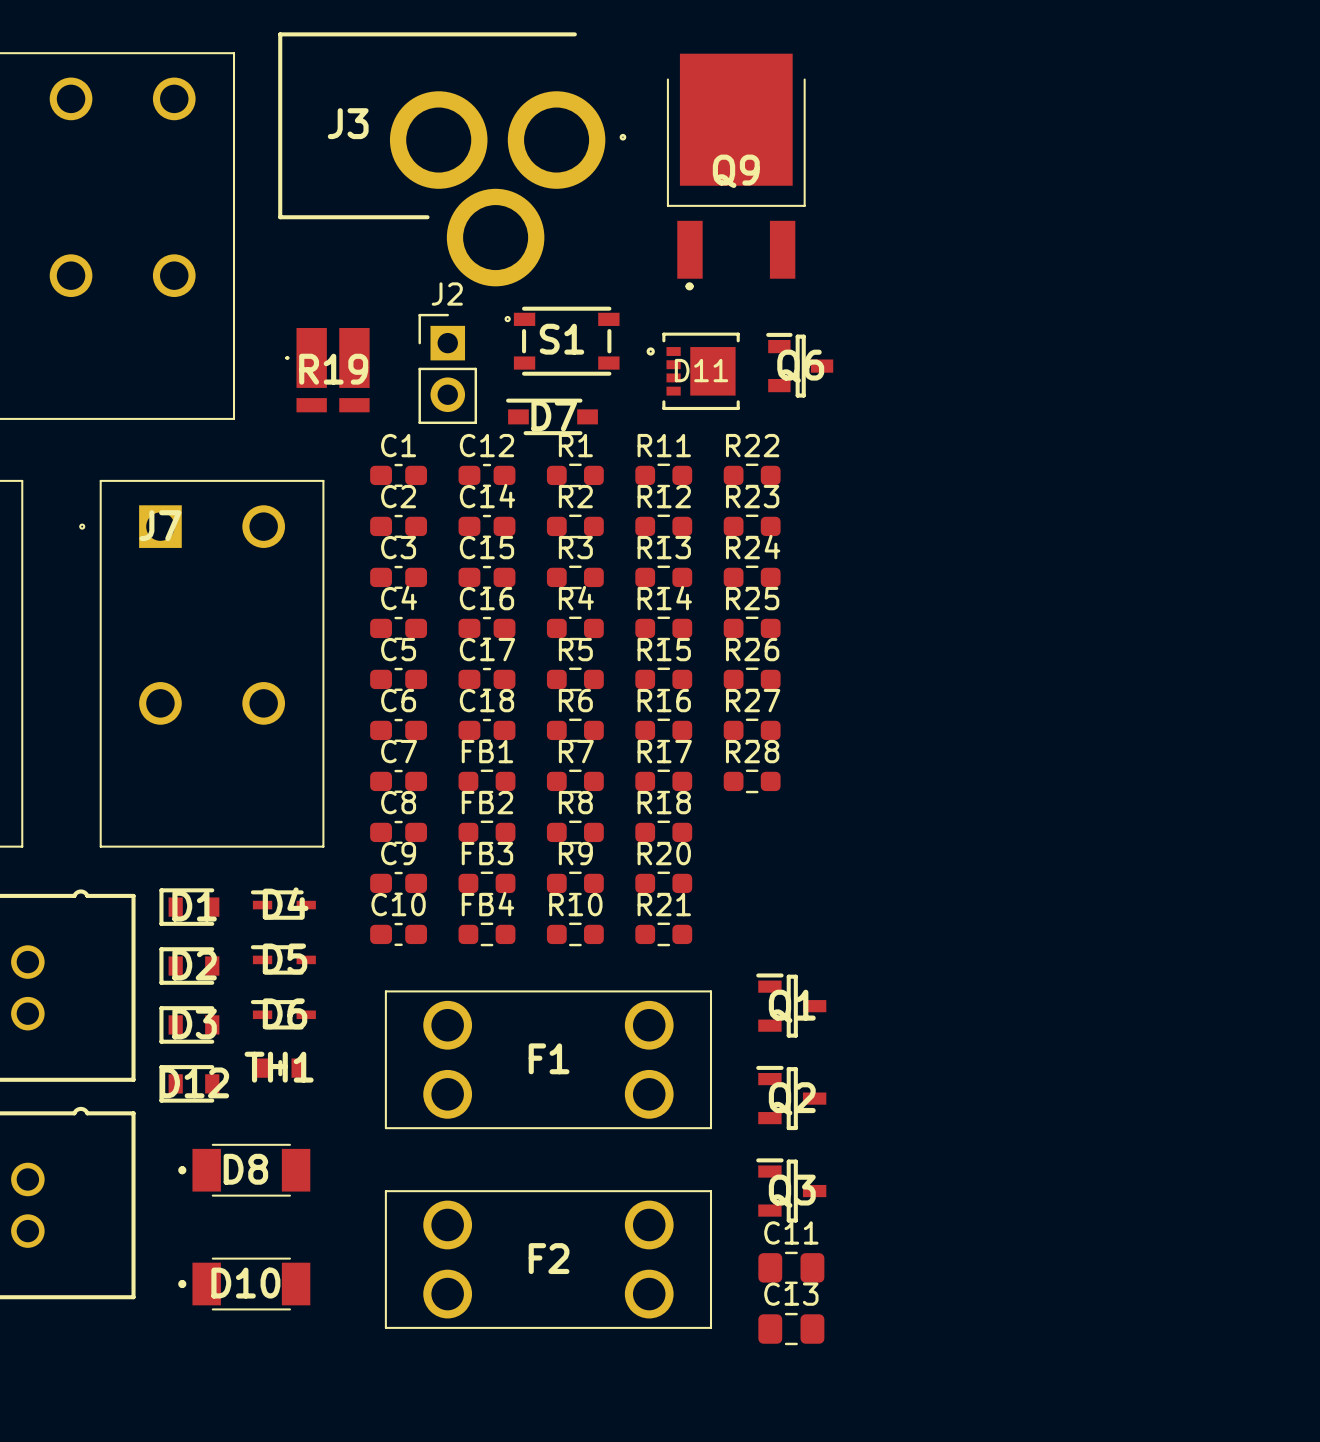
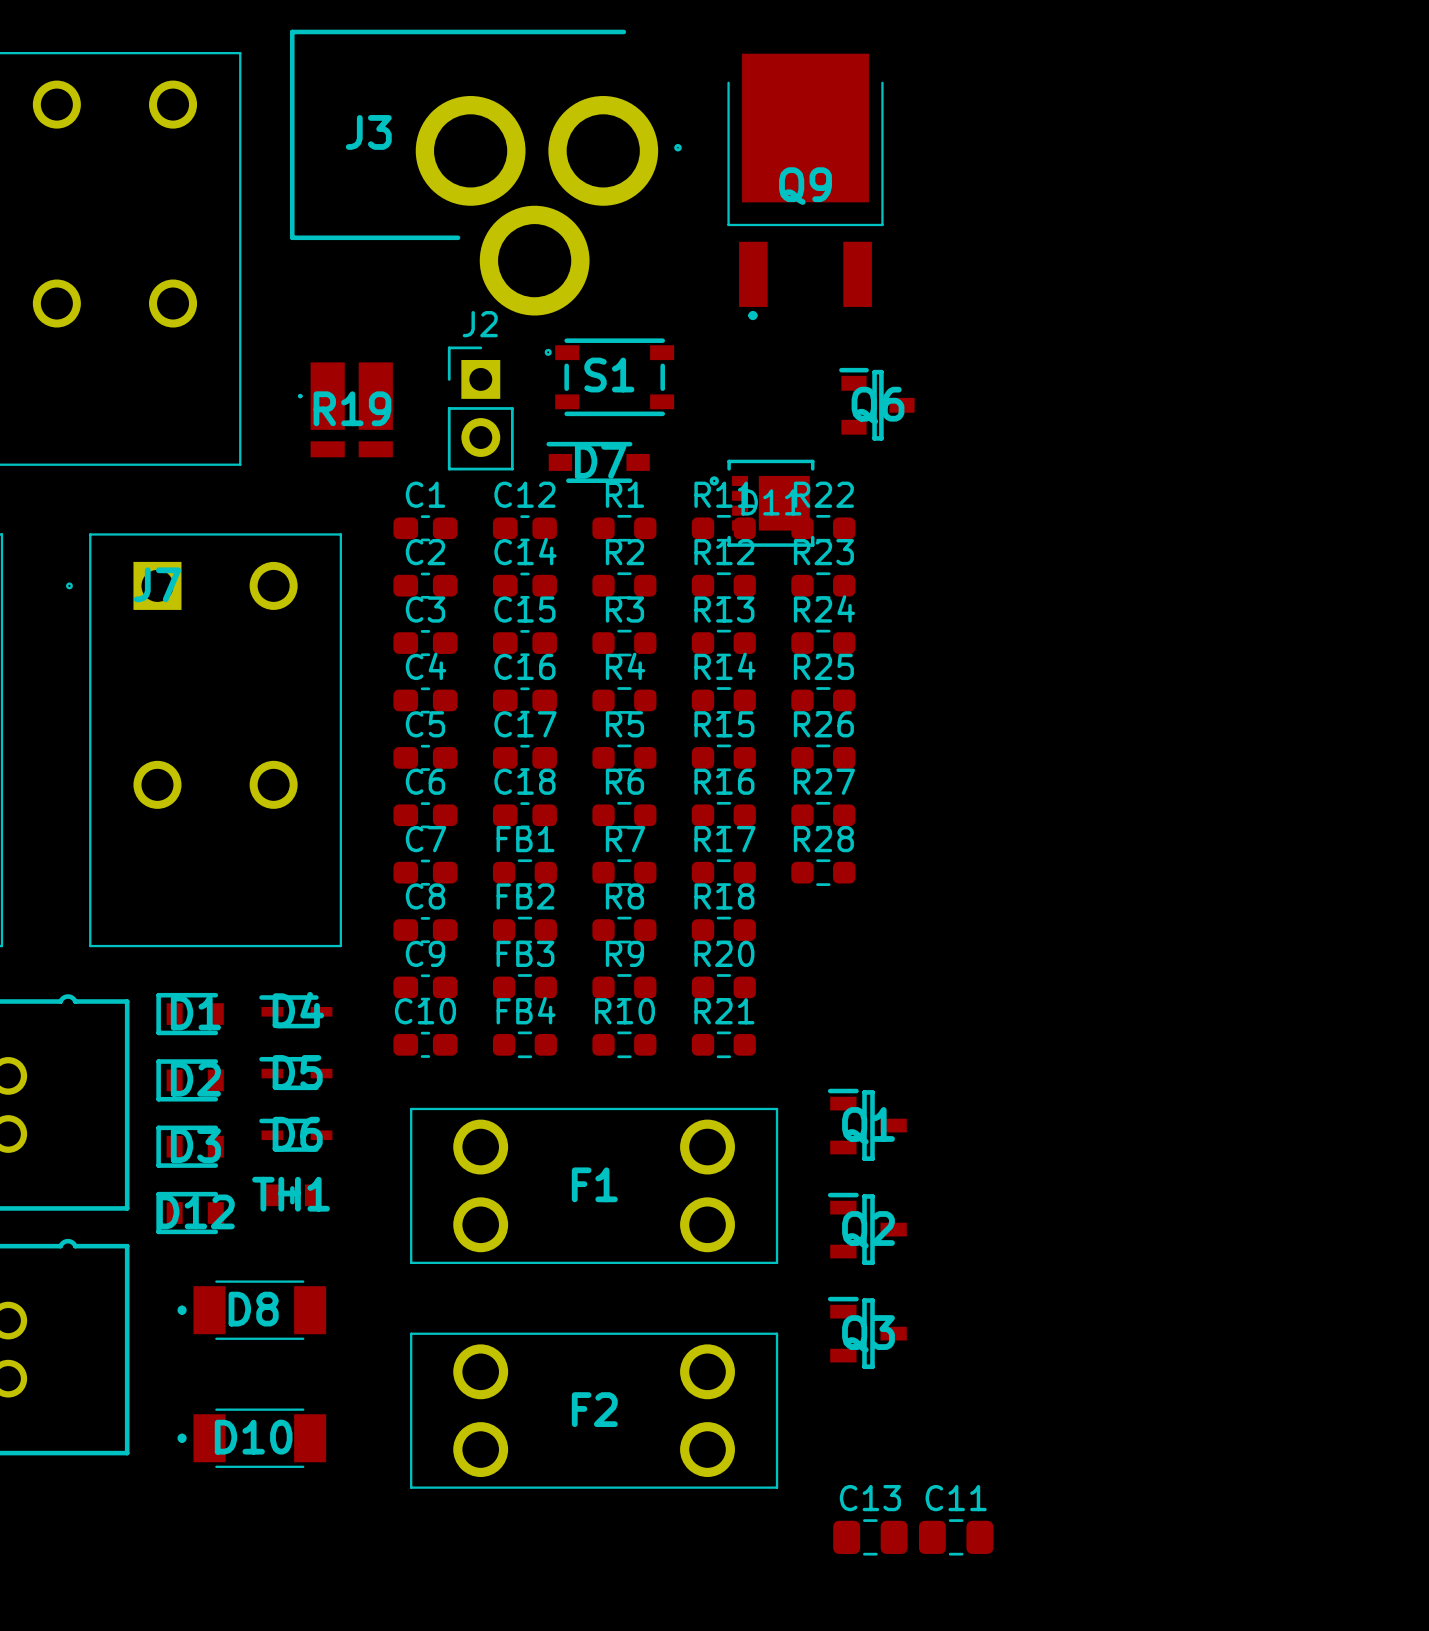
D11 position: (693, 371) -> (762, 503)
C11 position: (791, 1267) -> (956, 1537)
C13 position: (791, 1329) -> (870, 1537)

